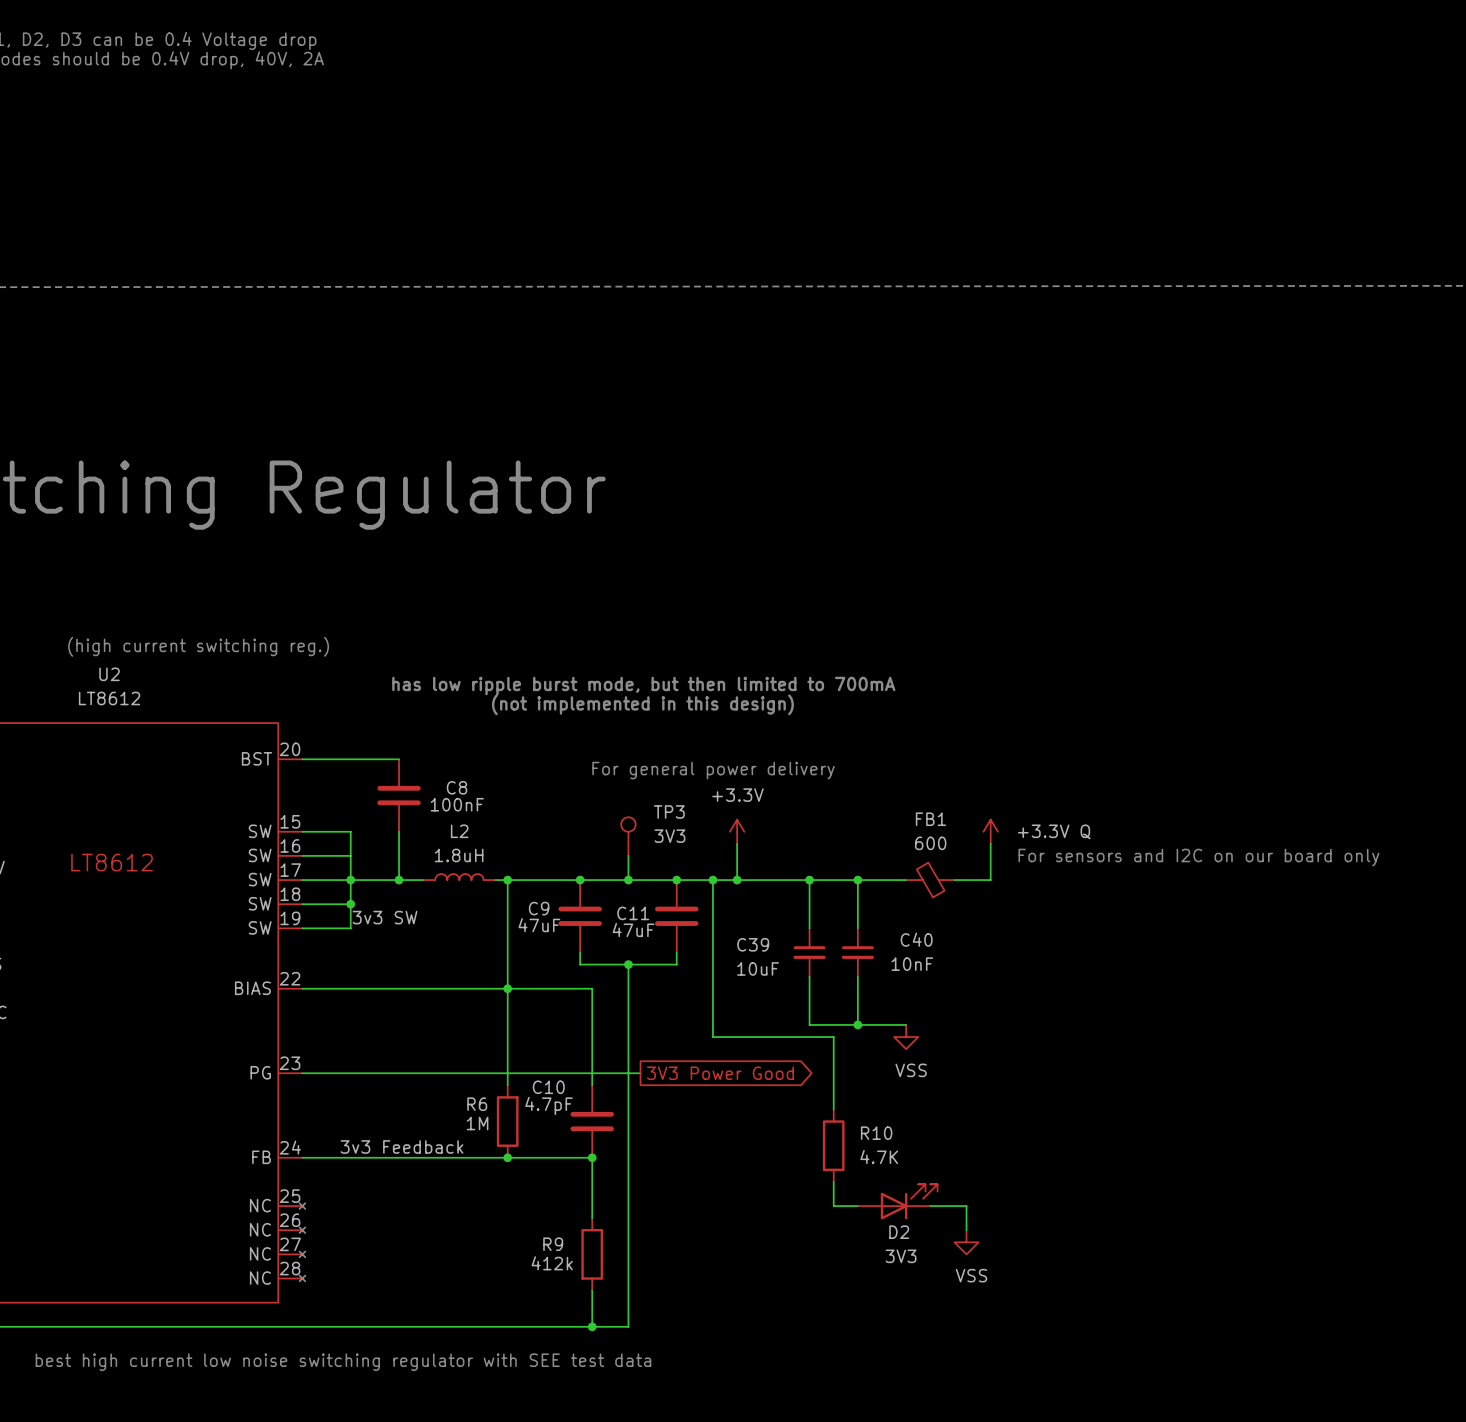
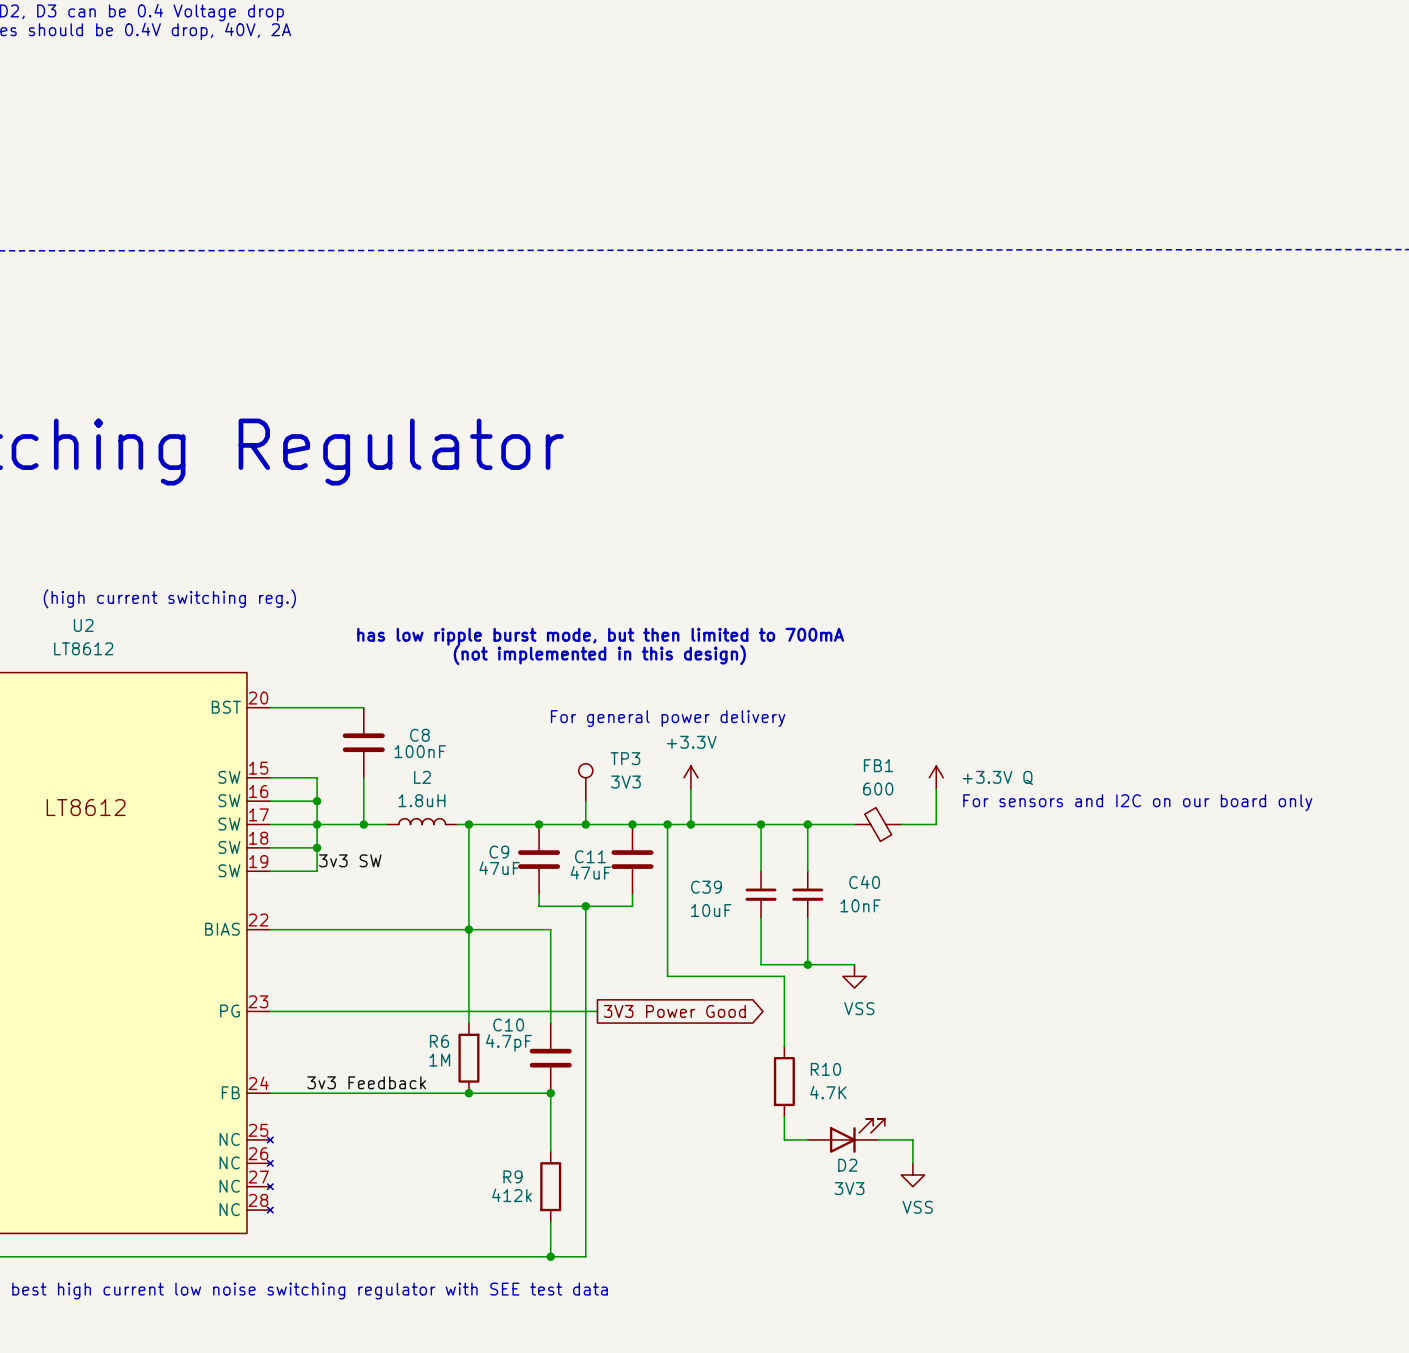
junction: none -> (317, 801)

